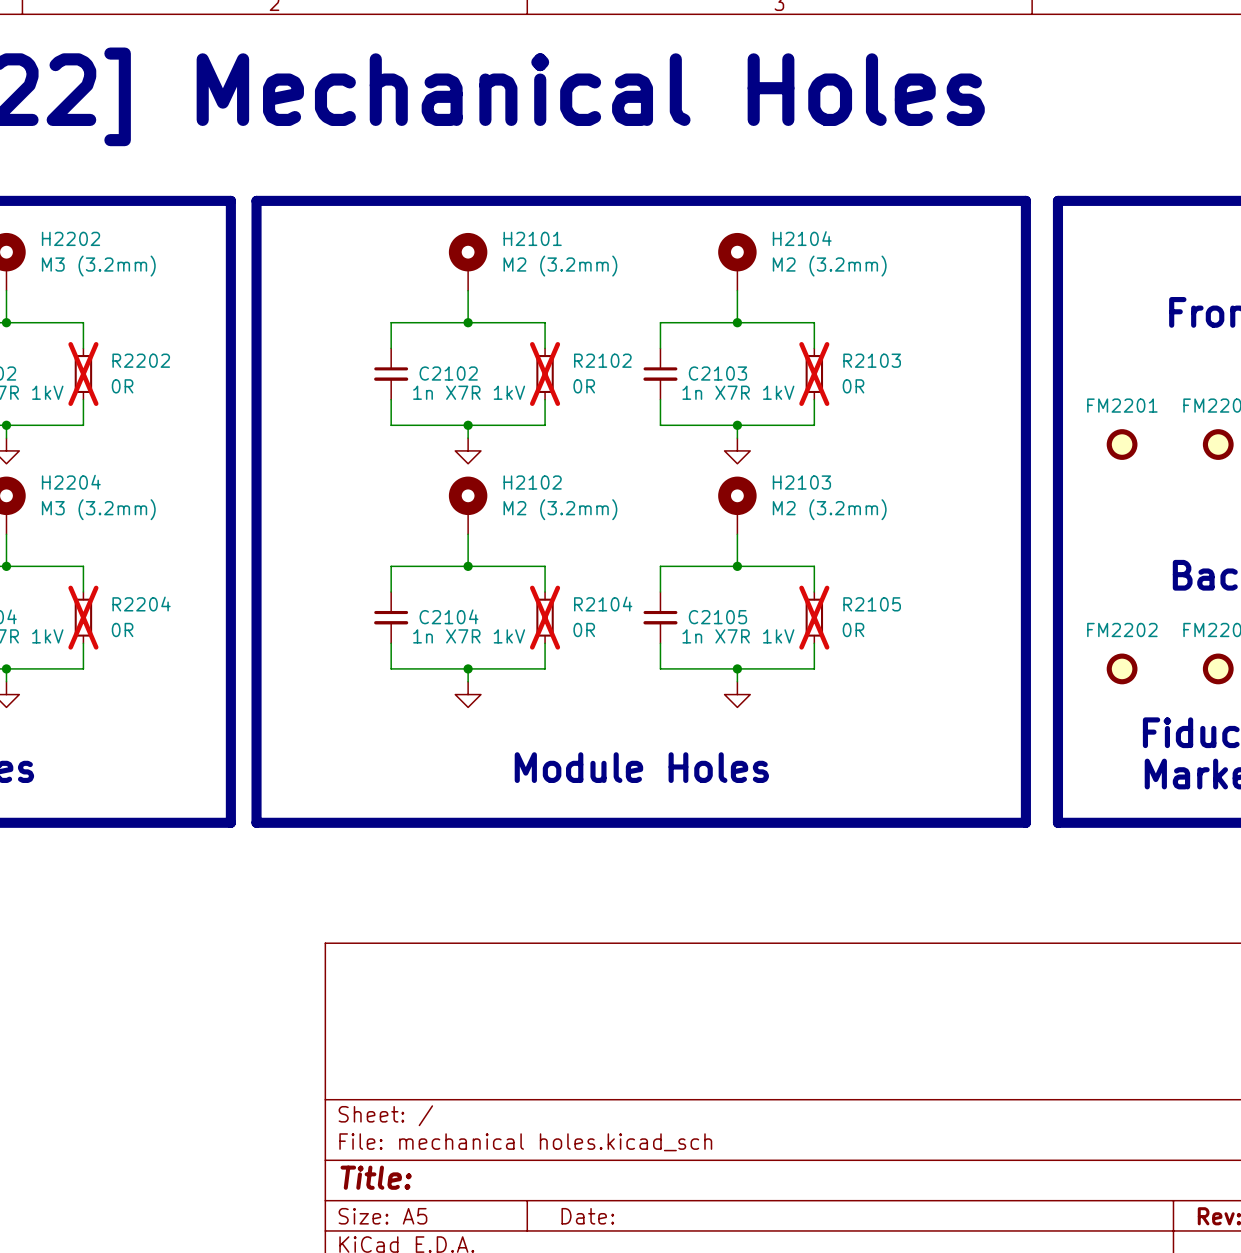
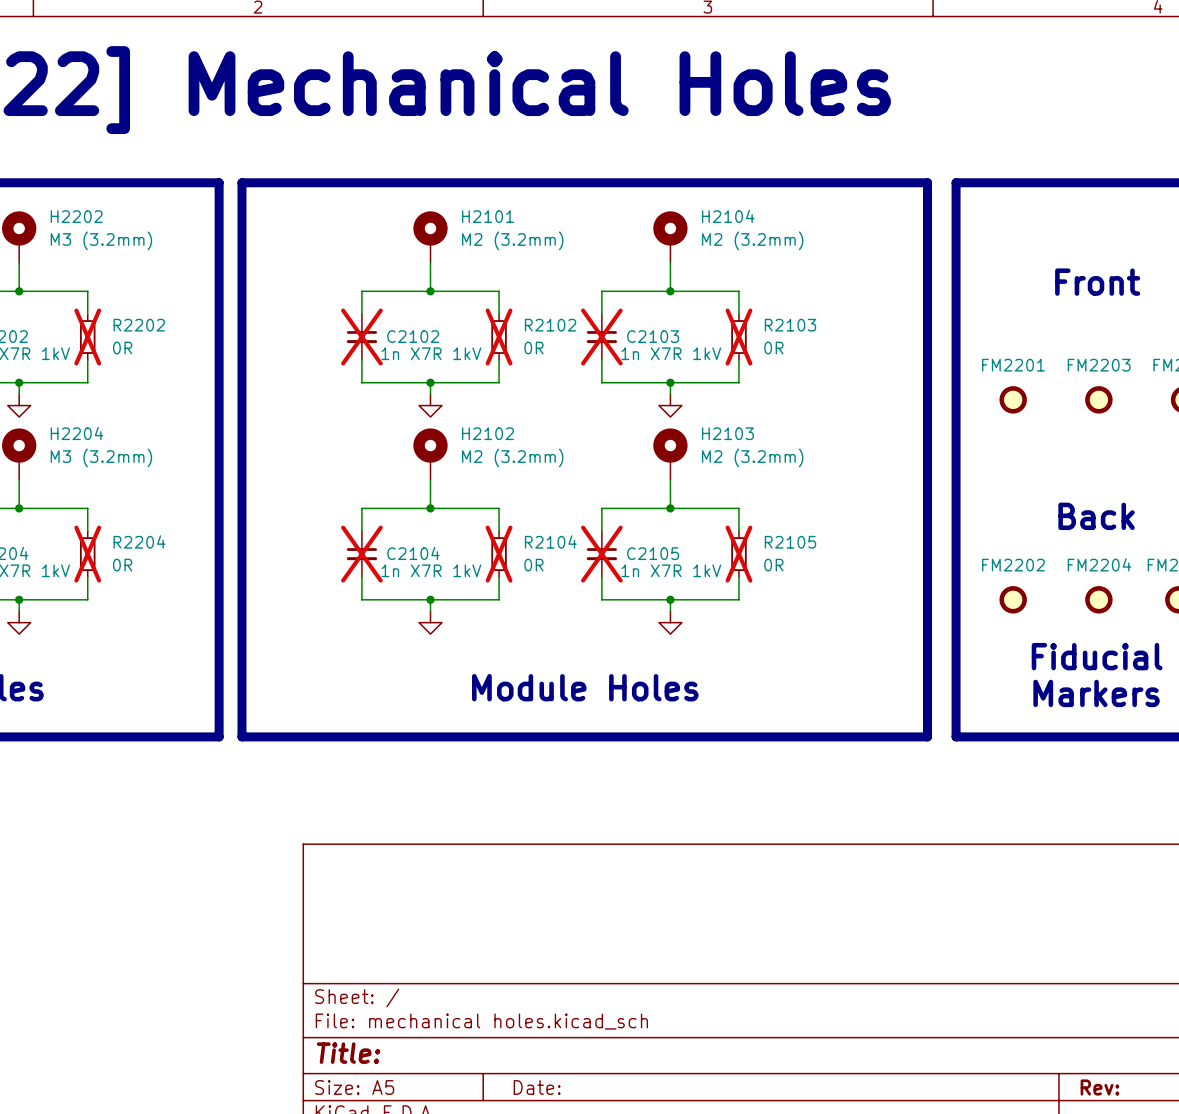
C2102 do-not-place cross: none -> (361, 337)
C2103 do-not-place cross: none -> (601, 337)
C2104 do-not-place cross: none -> (361, 554)
C2105 do-not-place cross: none -> (601, 554)

